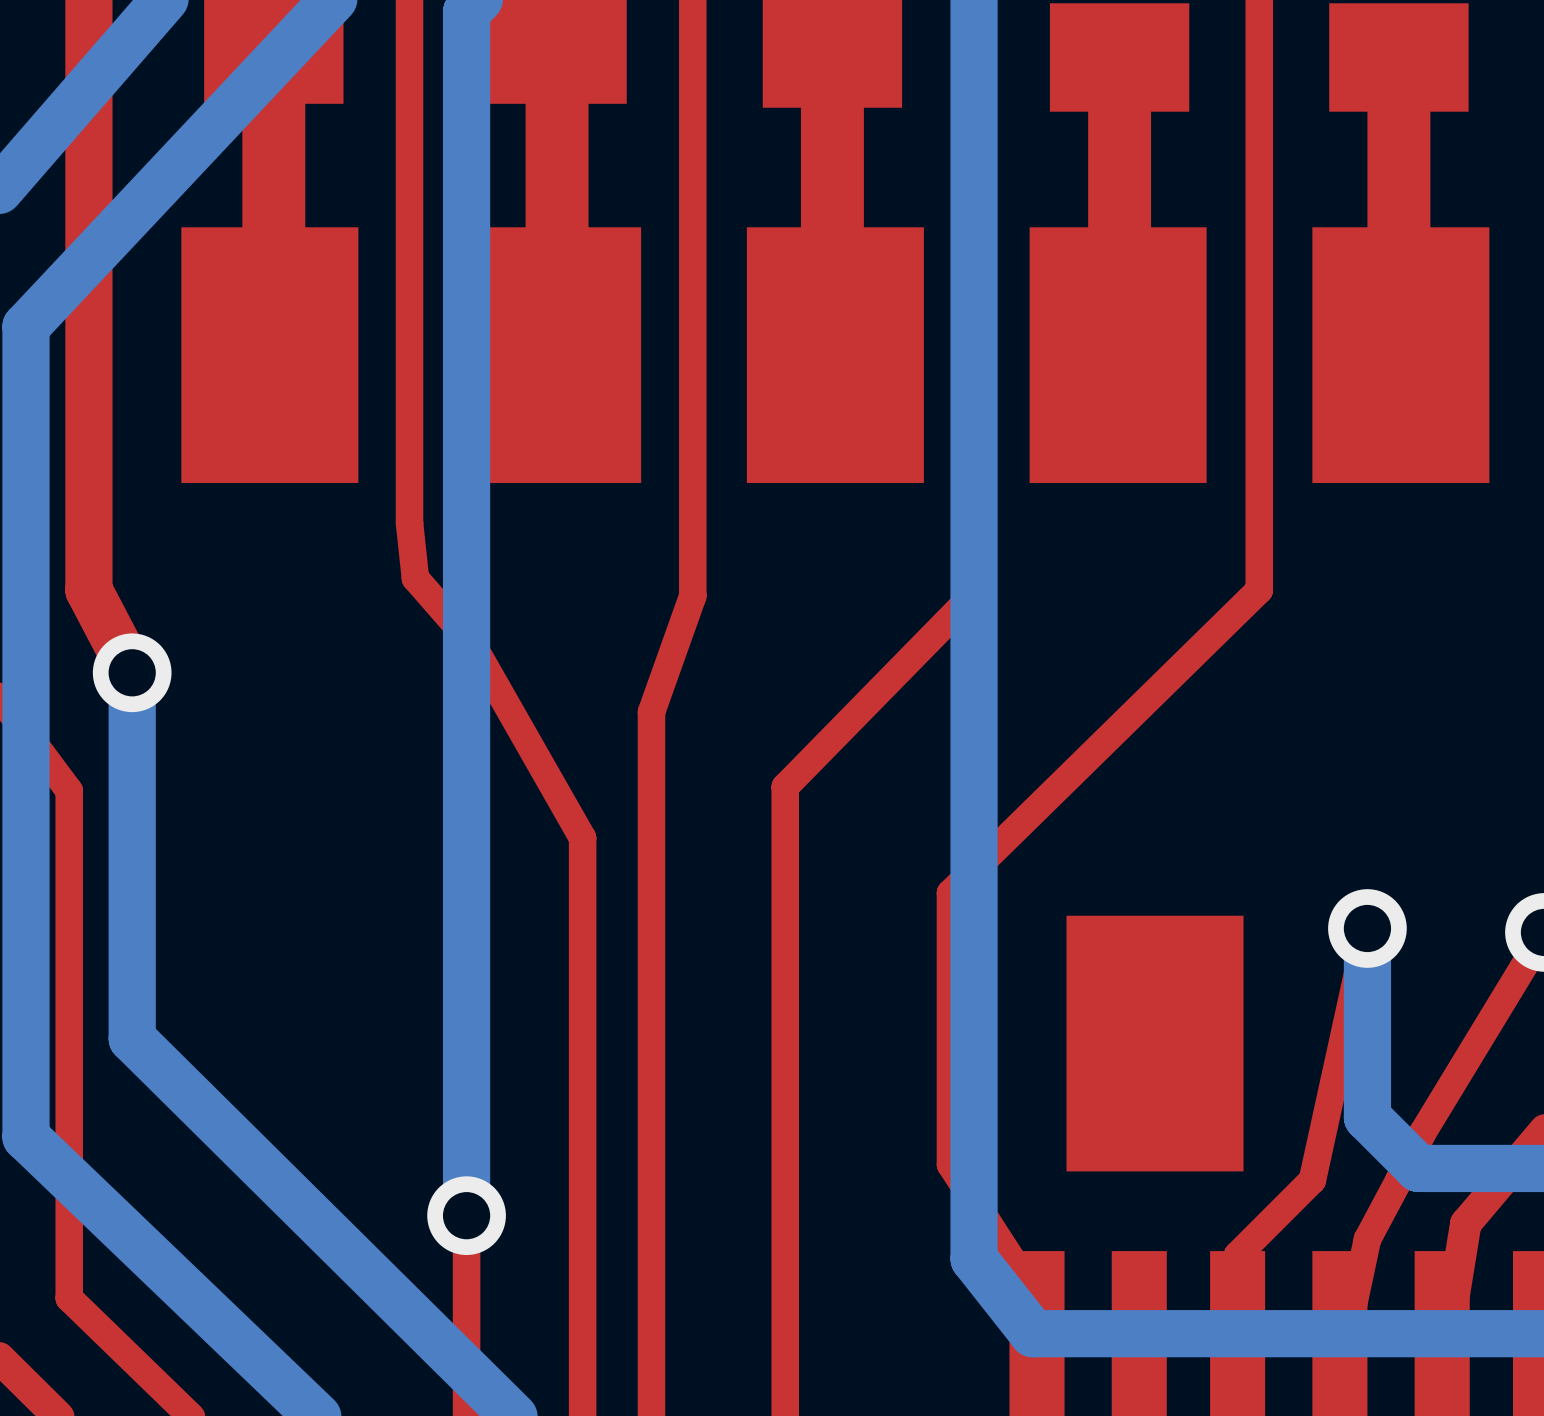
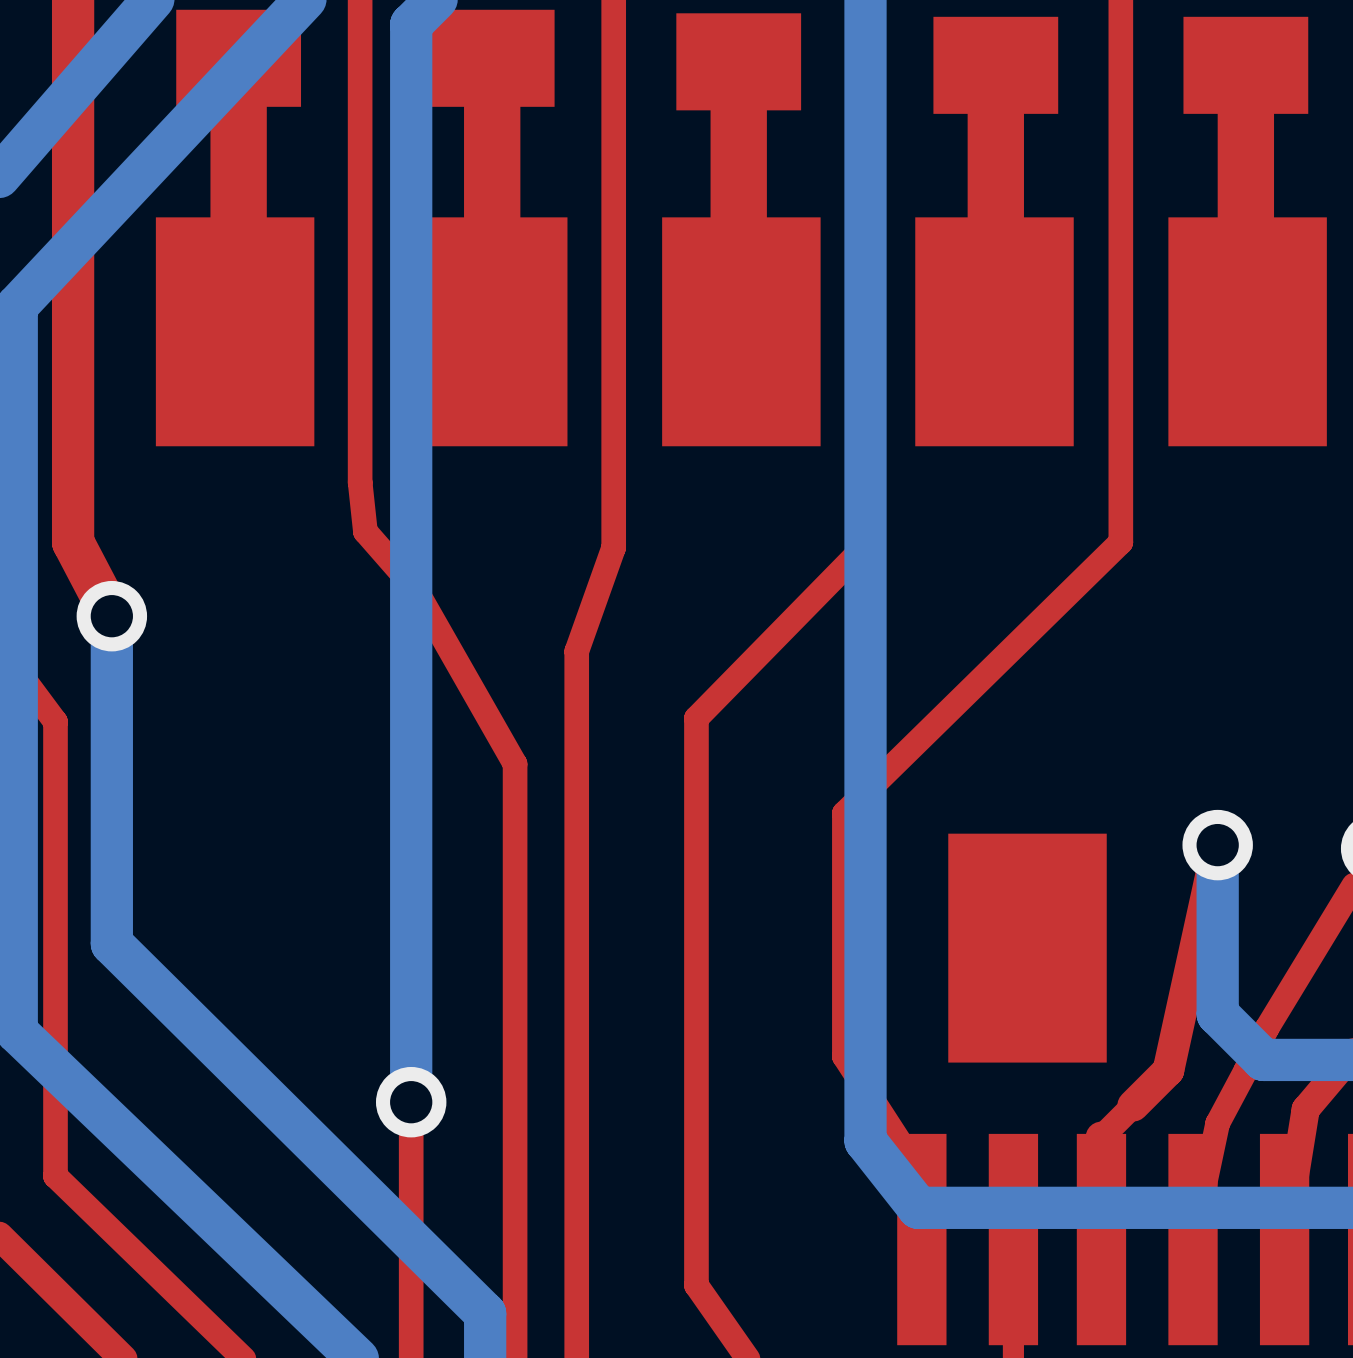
top track width: thin (1367, 928) (1312, 1180) (1273, 1219) -> thick (1217, 845) (1168, 1070) (1133, 1105)

